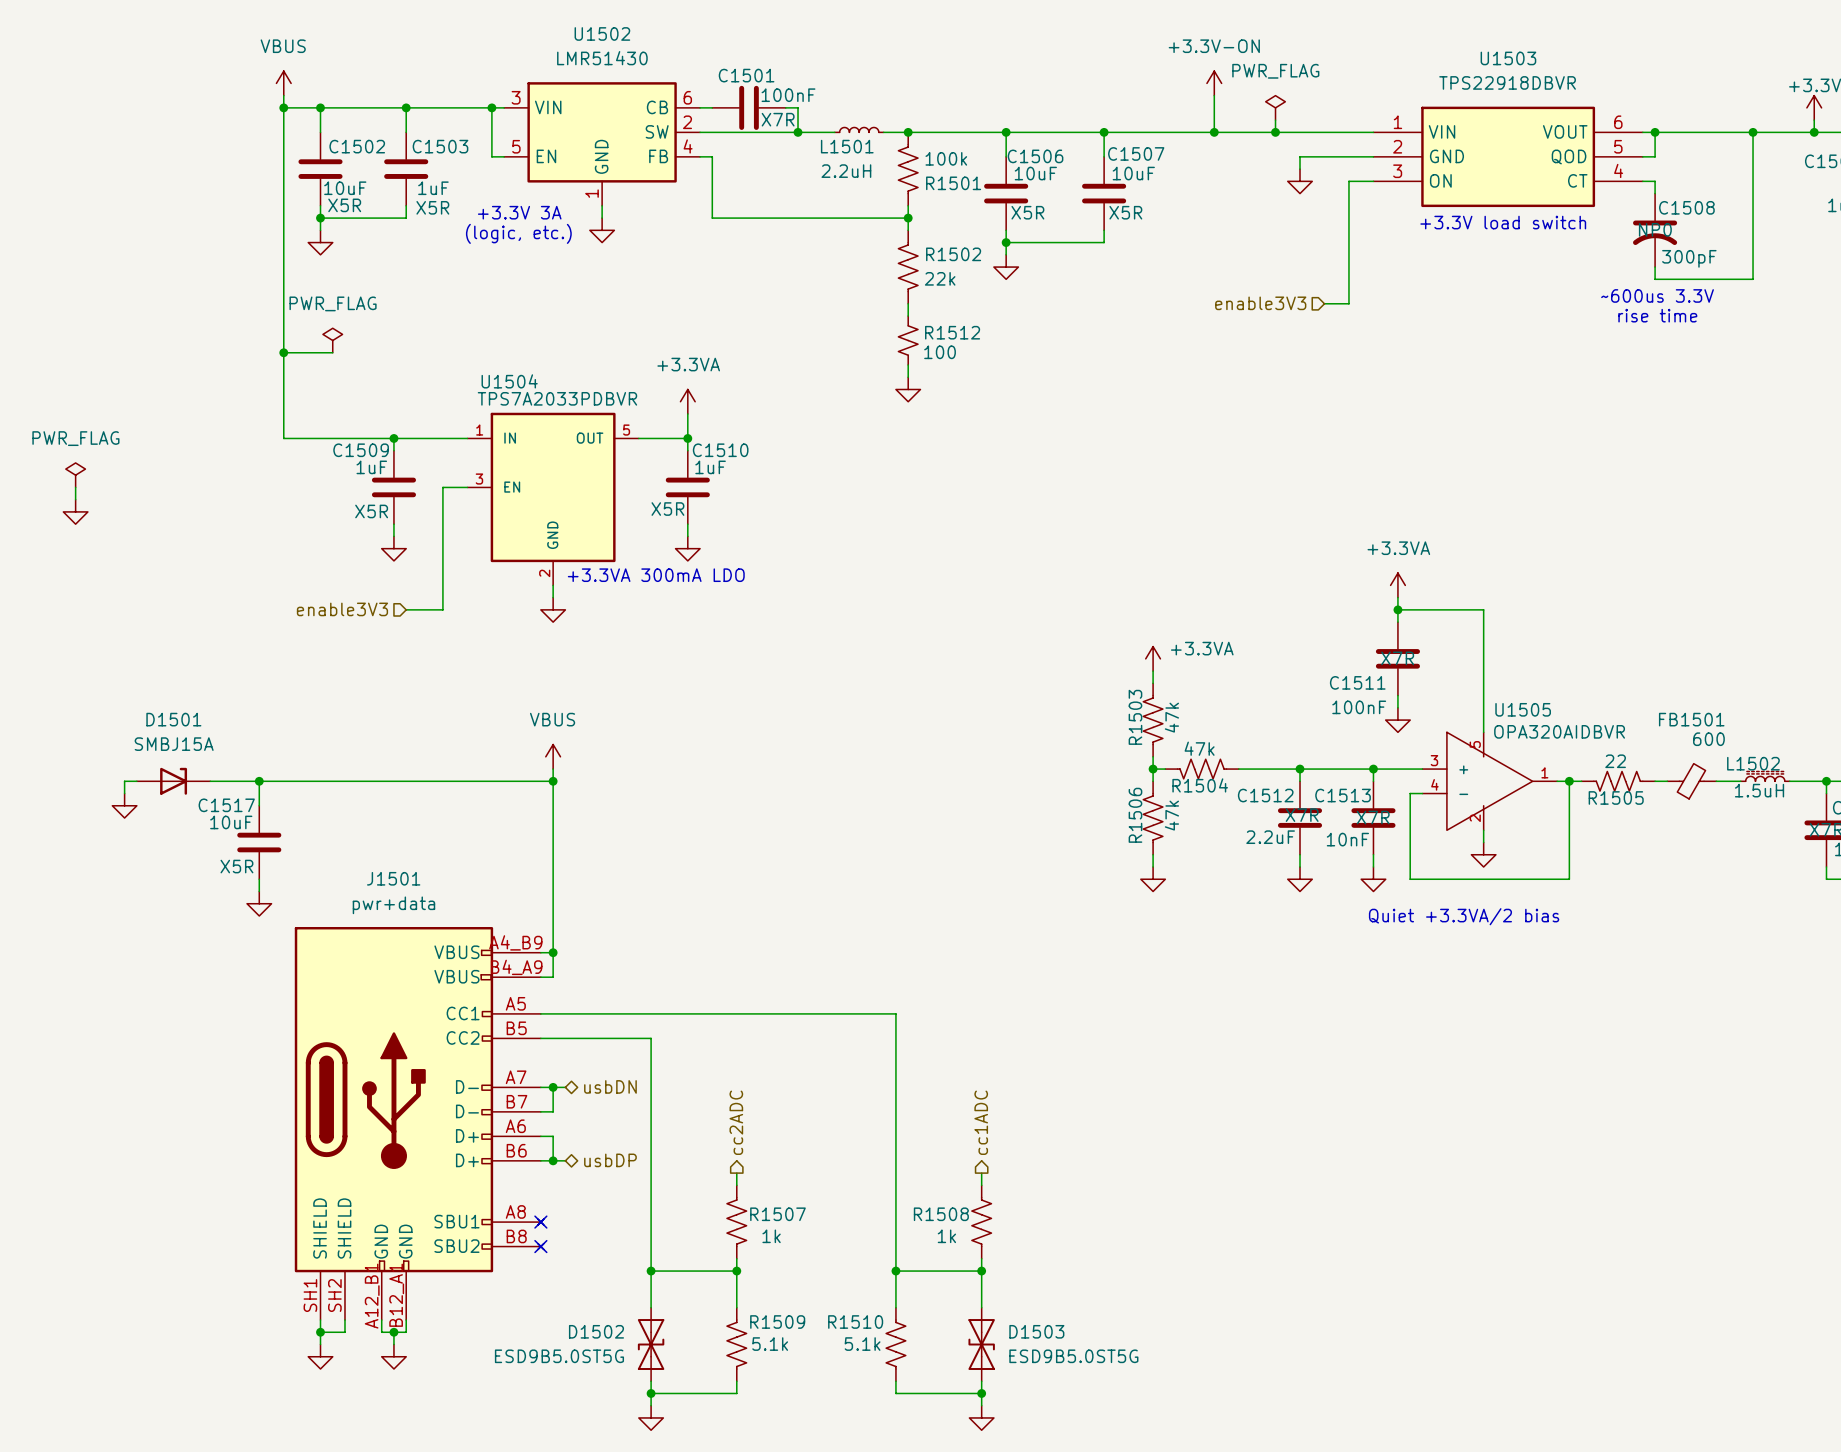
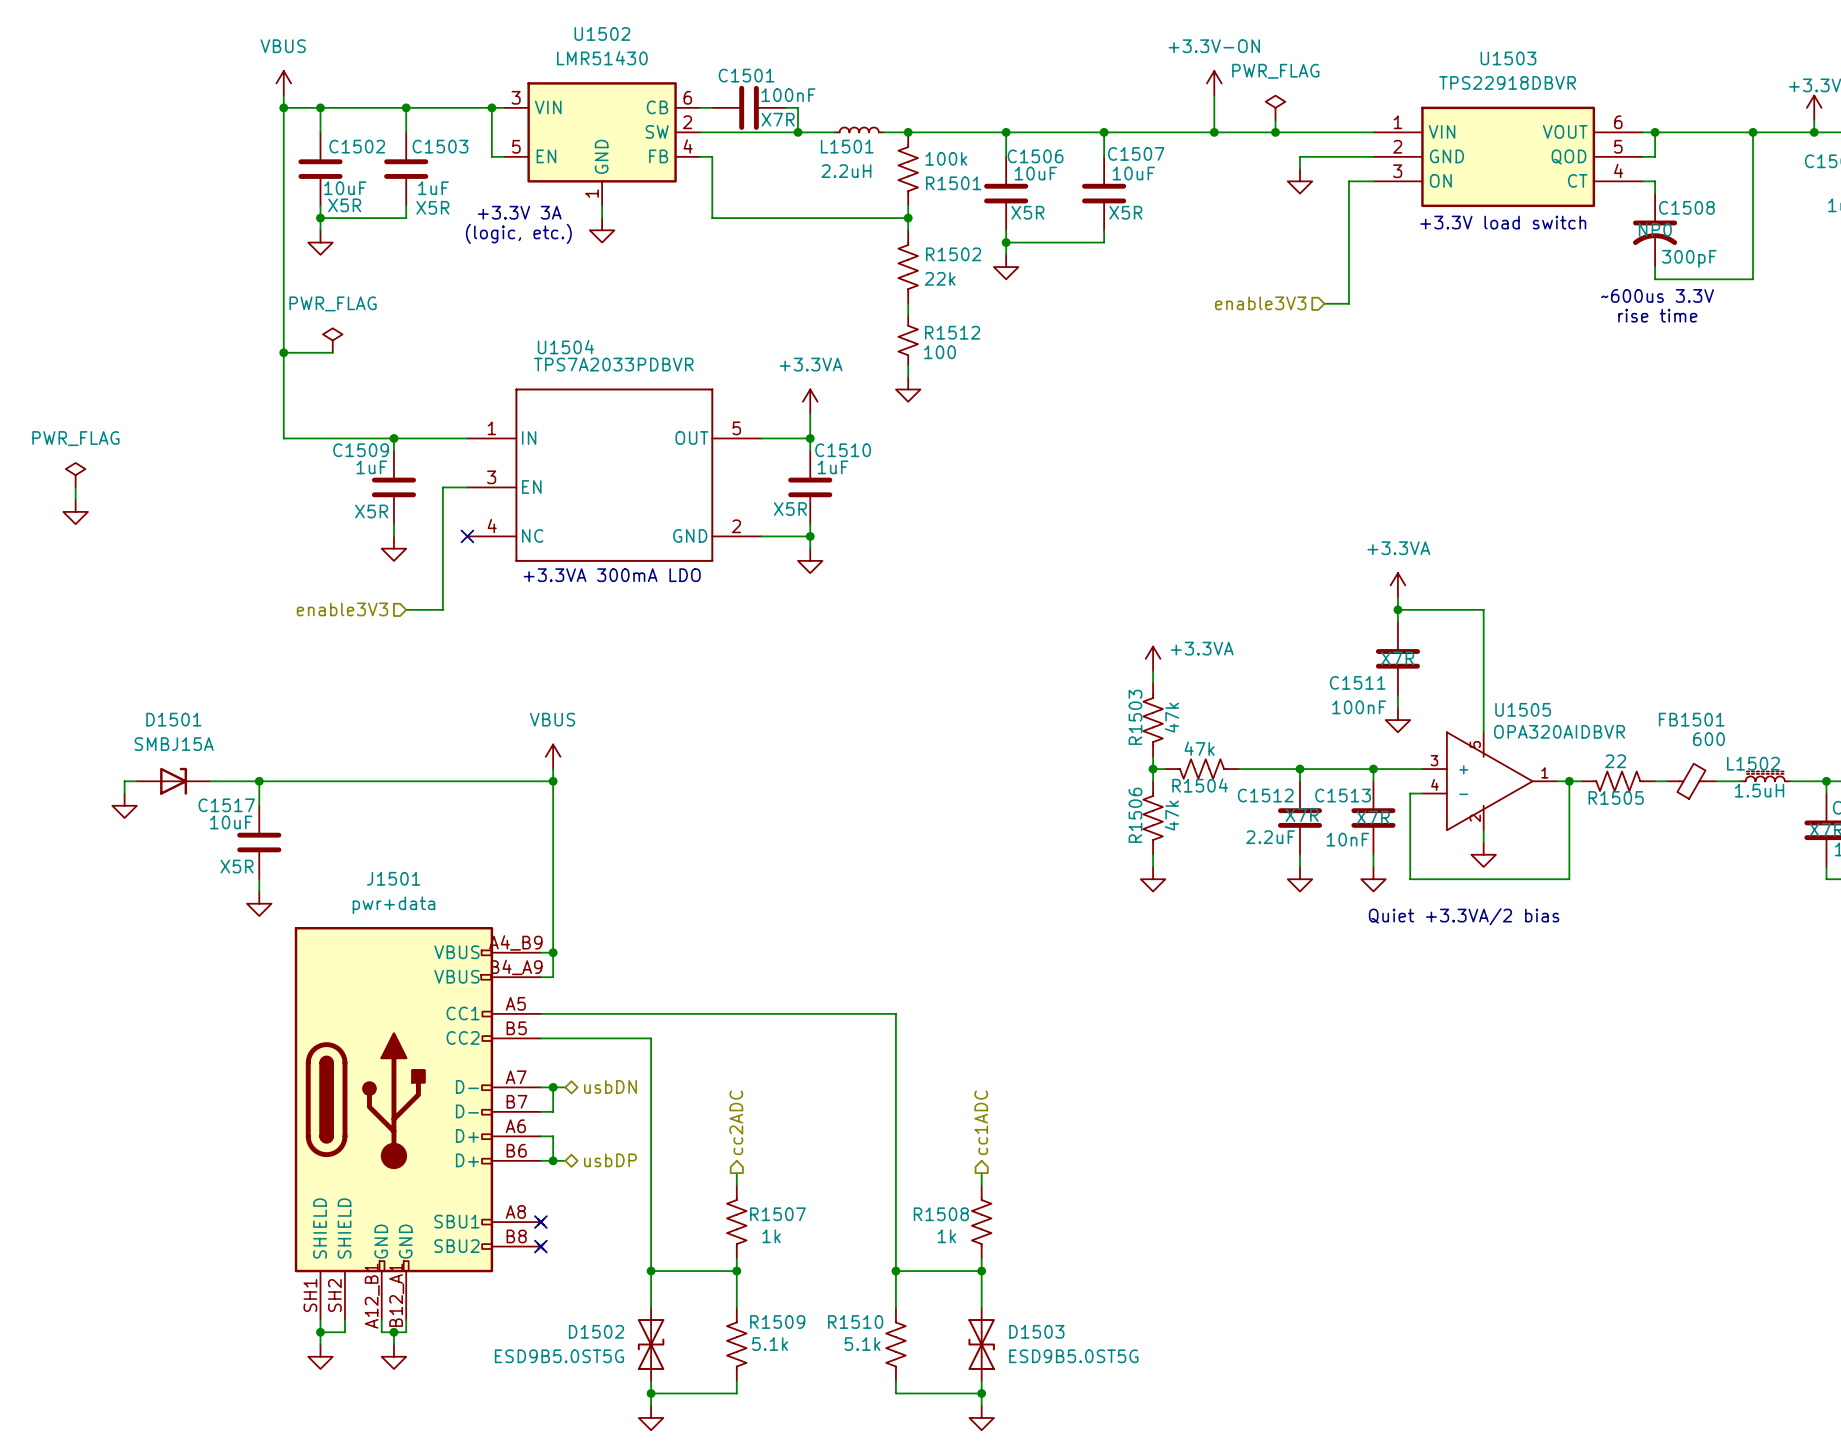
power symbol position: +3.3VA (687, 401) -> +3.3VA (810, 401)
U1504 symbol: [467, 412, 639, 586] -> [467, 388, 762, 562]
wire: (687, 413) (687, 450) -> (810, 413) (810, 450)
wire: (638, 438) (687, 438) -> (761, 438) (810, 438)
junction: (687, 438) -> none
junction: none -> (810, 438)
C1510 position: (687, 487) -> (810, 487)
wire: (687, 524) (687, 536) -> none
wire: none -> (810, 524) (810, 548)
no-connect mark: none -> (467, 536)
wire: none -> (761, 536) (810, 536)
junction: none -> (810, 536)
power symbol position: (687, 548) -> (810, 560)
text position: +3.3VA 300mA LDO (656, 575) -> +3.3VA 300mA LDO (612, 575)
wire: (553, 585) (553, 597) -> none
power symbol: (553, 609) -> none

